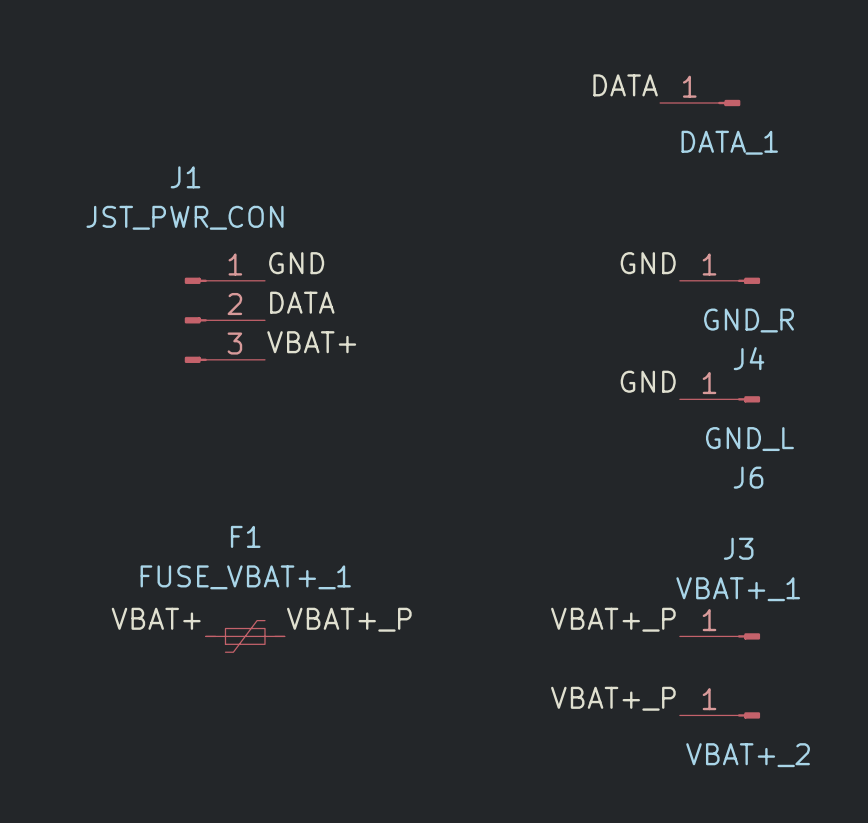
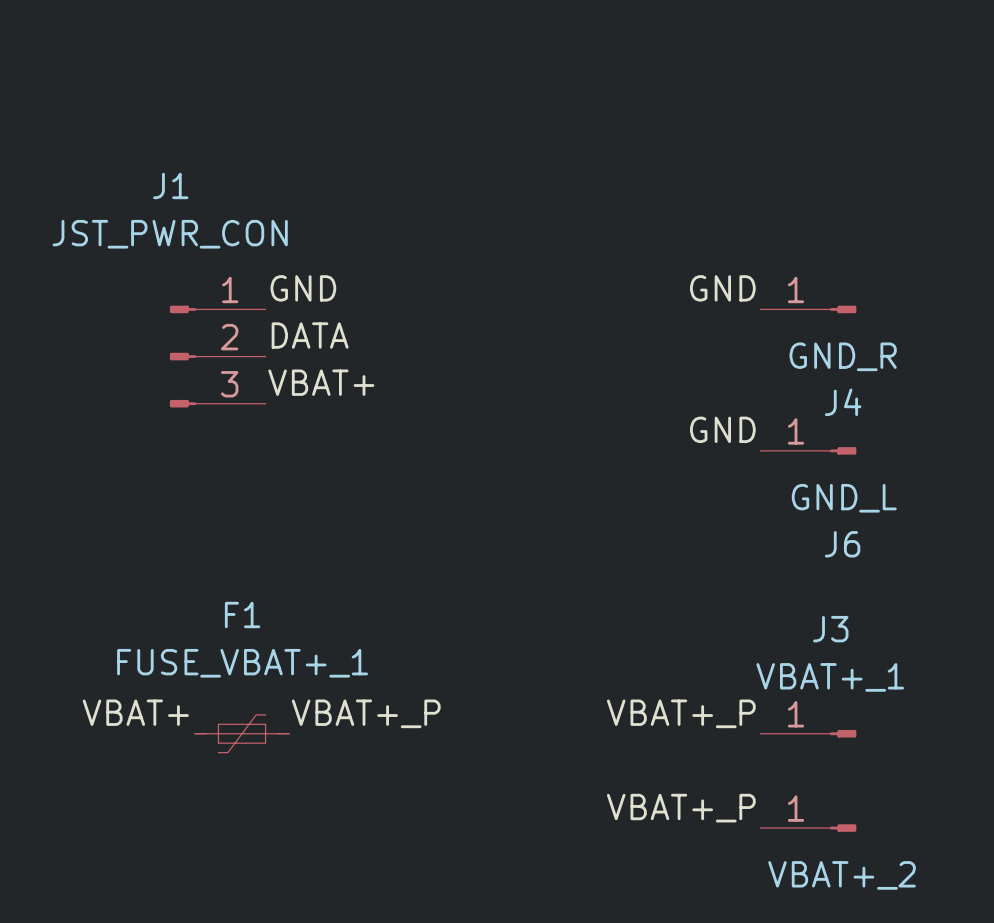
label: DATA (625, 85) -> none
part: DATA_1 (700, 103) -> none

